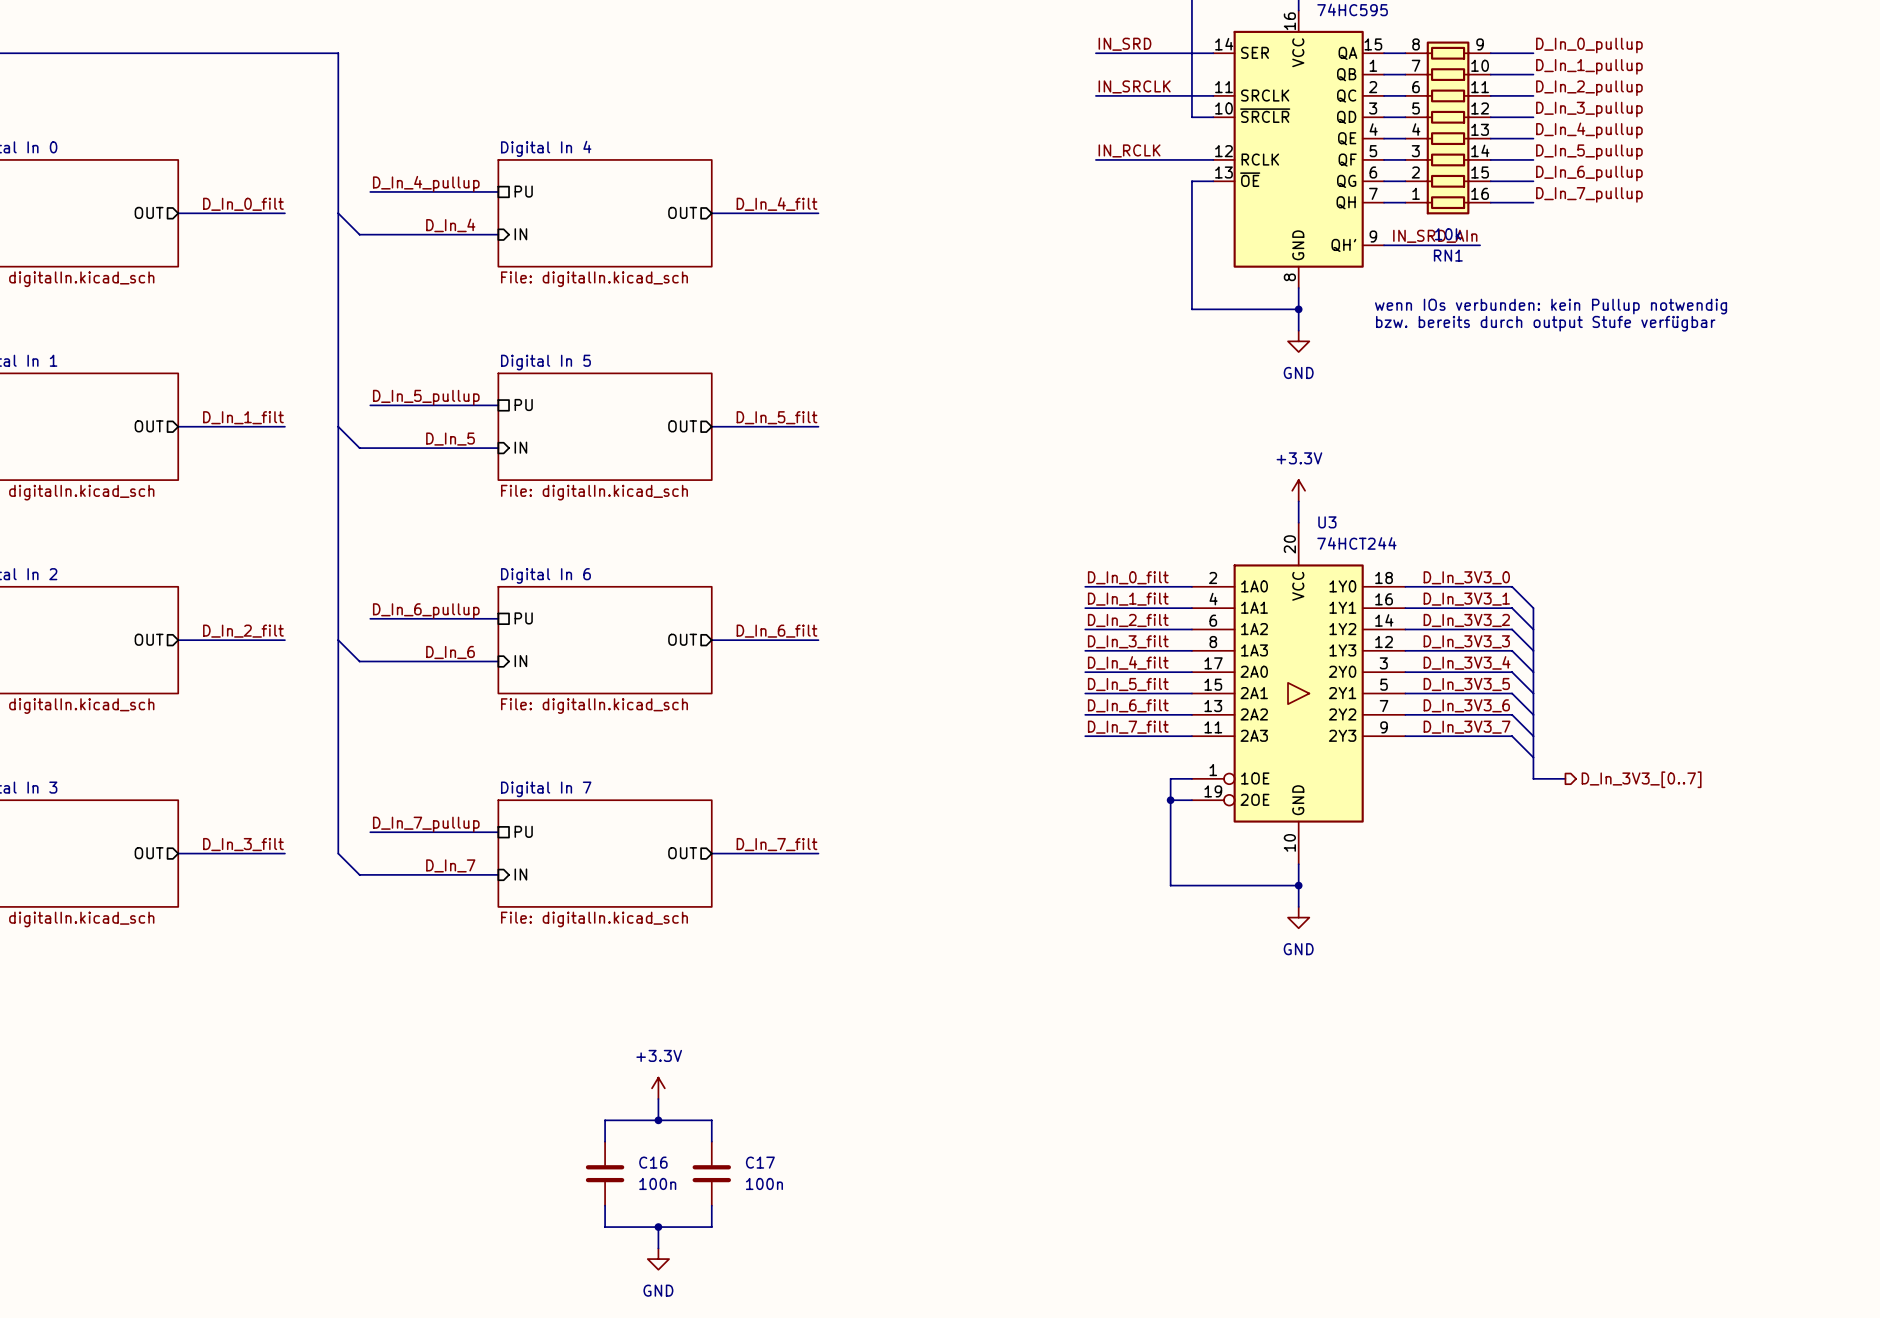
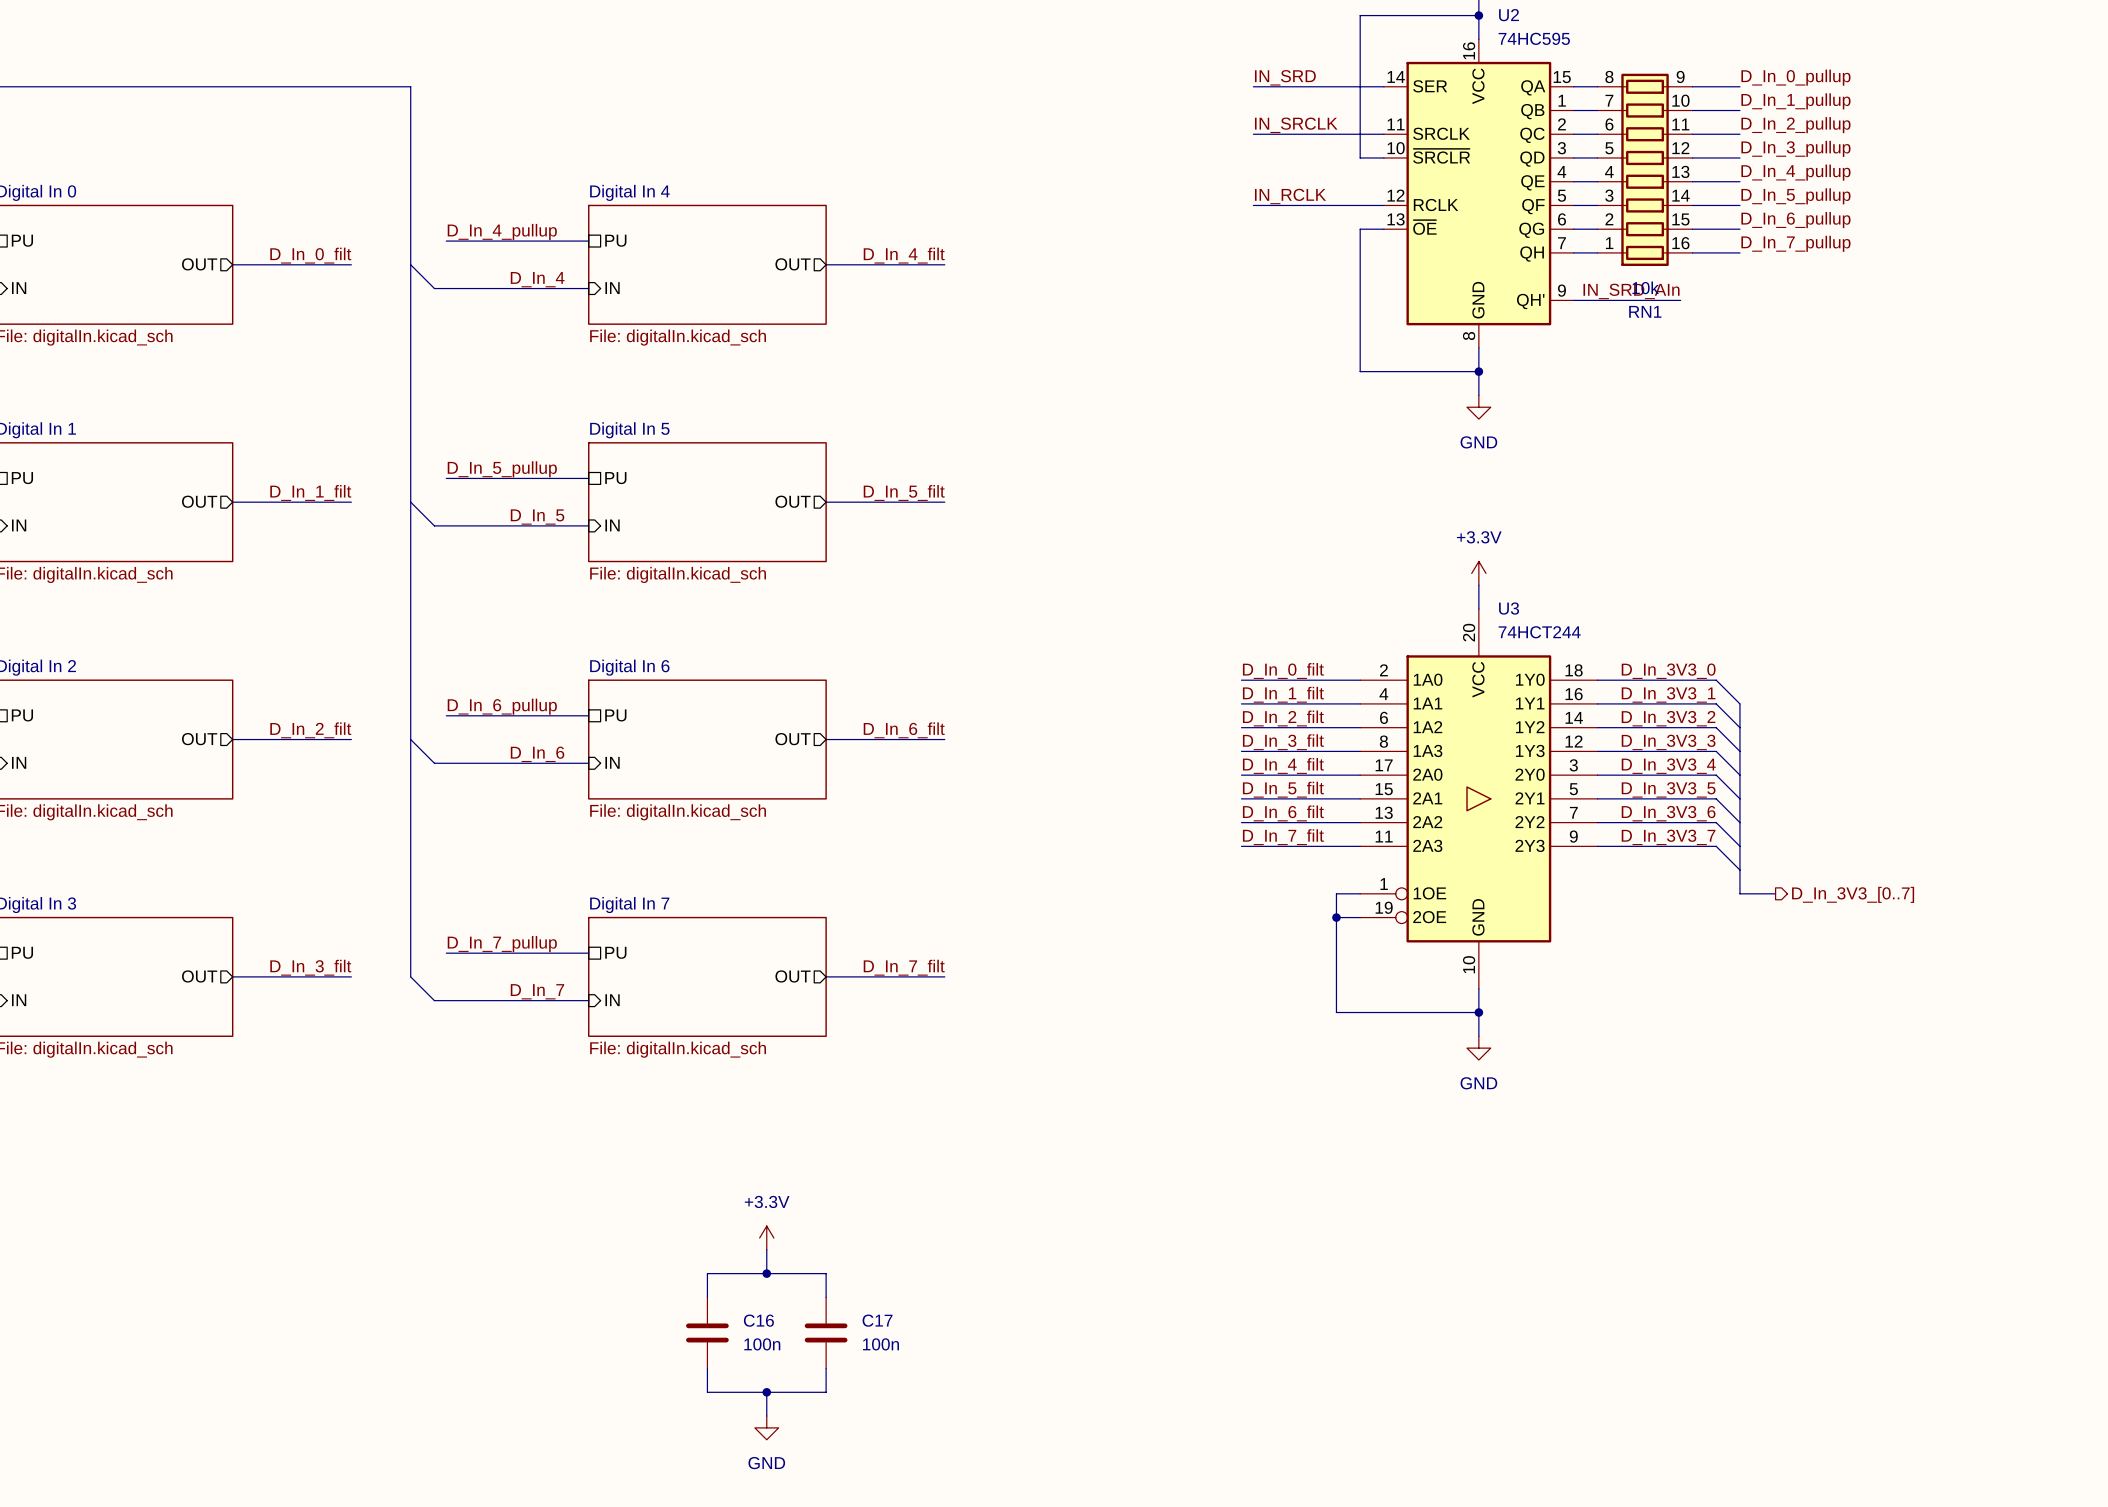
text: wenn IOs verbunden: kein Pullup notwendig (1551, 306) -> none
text: bzw. bereits durch output Stufe verfügbar (1545, 323) -> none

